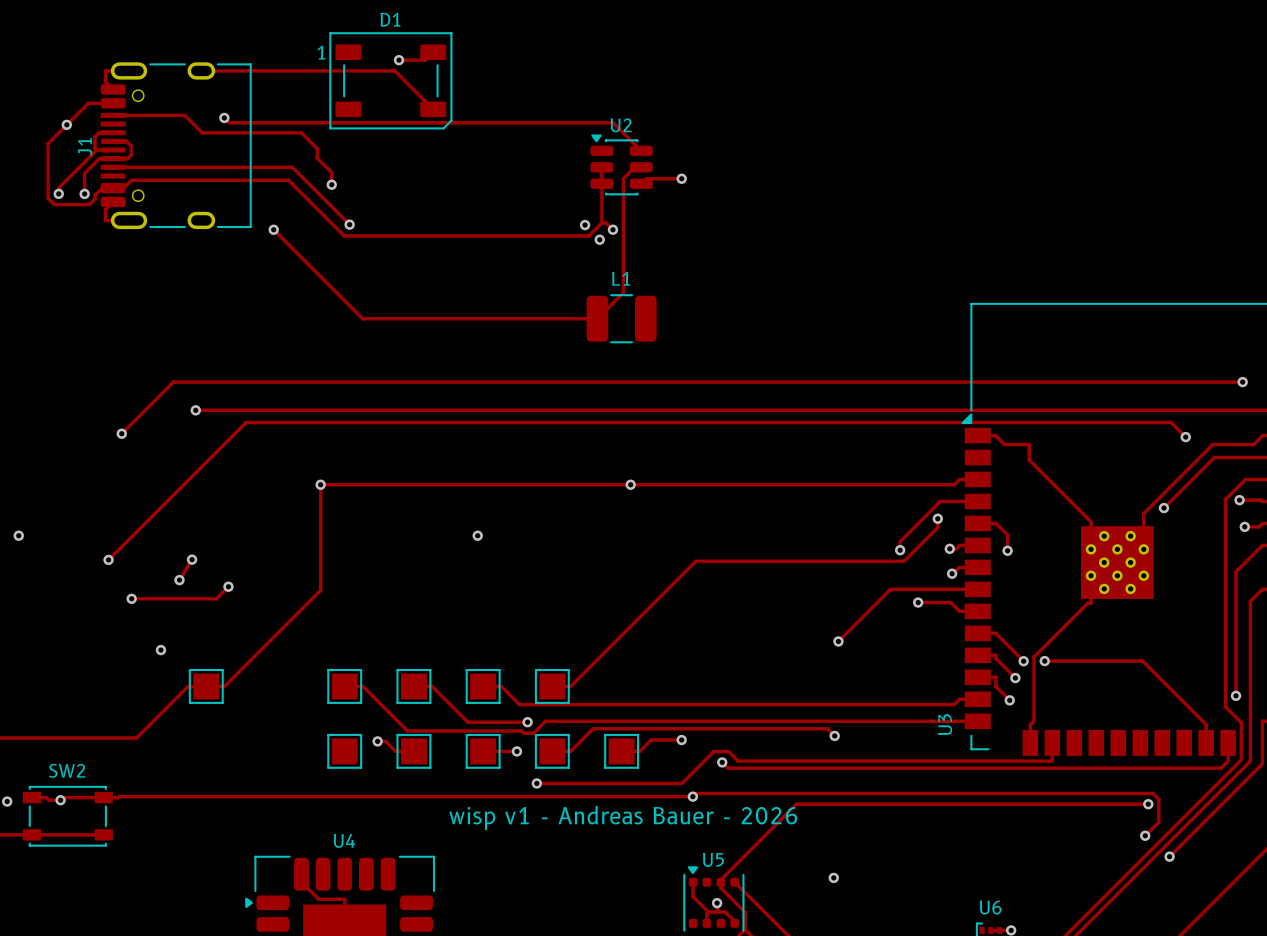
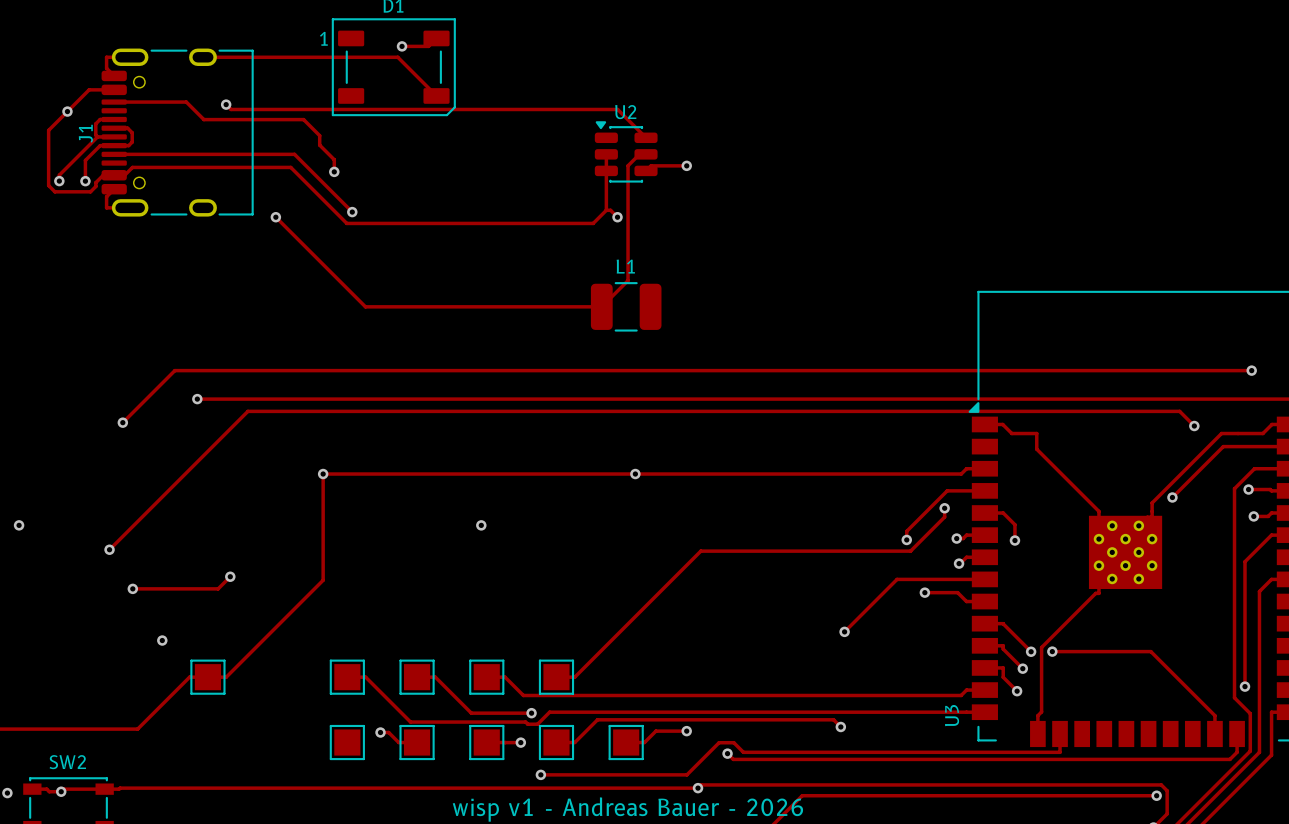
via: (585, 225) -> none
via: (599, 239) -> none
track: (192, 559) (179, 580) -> none
via: (192, 559) -> none
via: (179, 580) -> none

